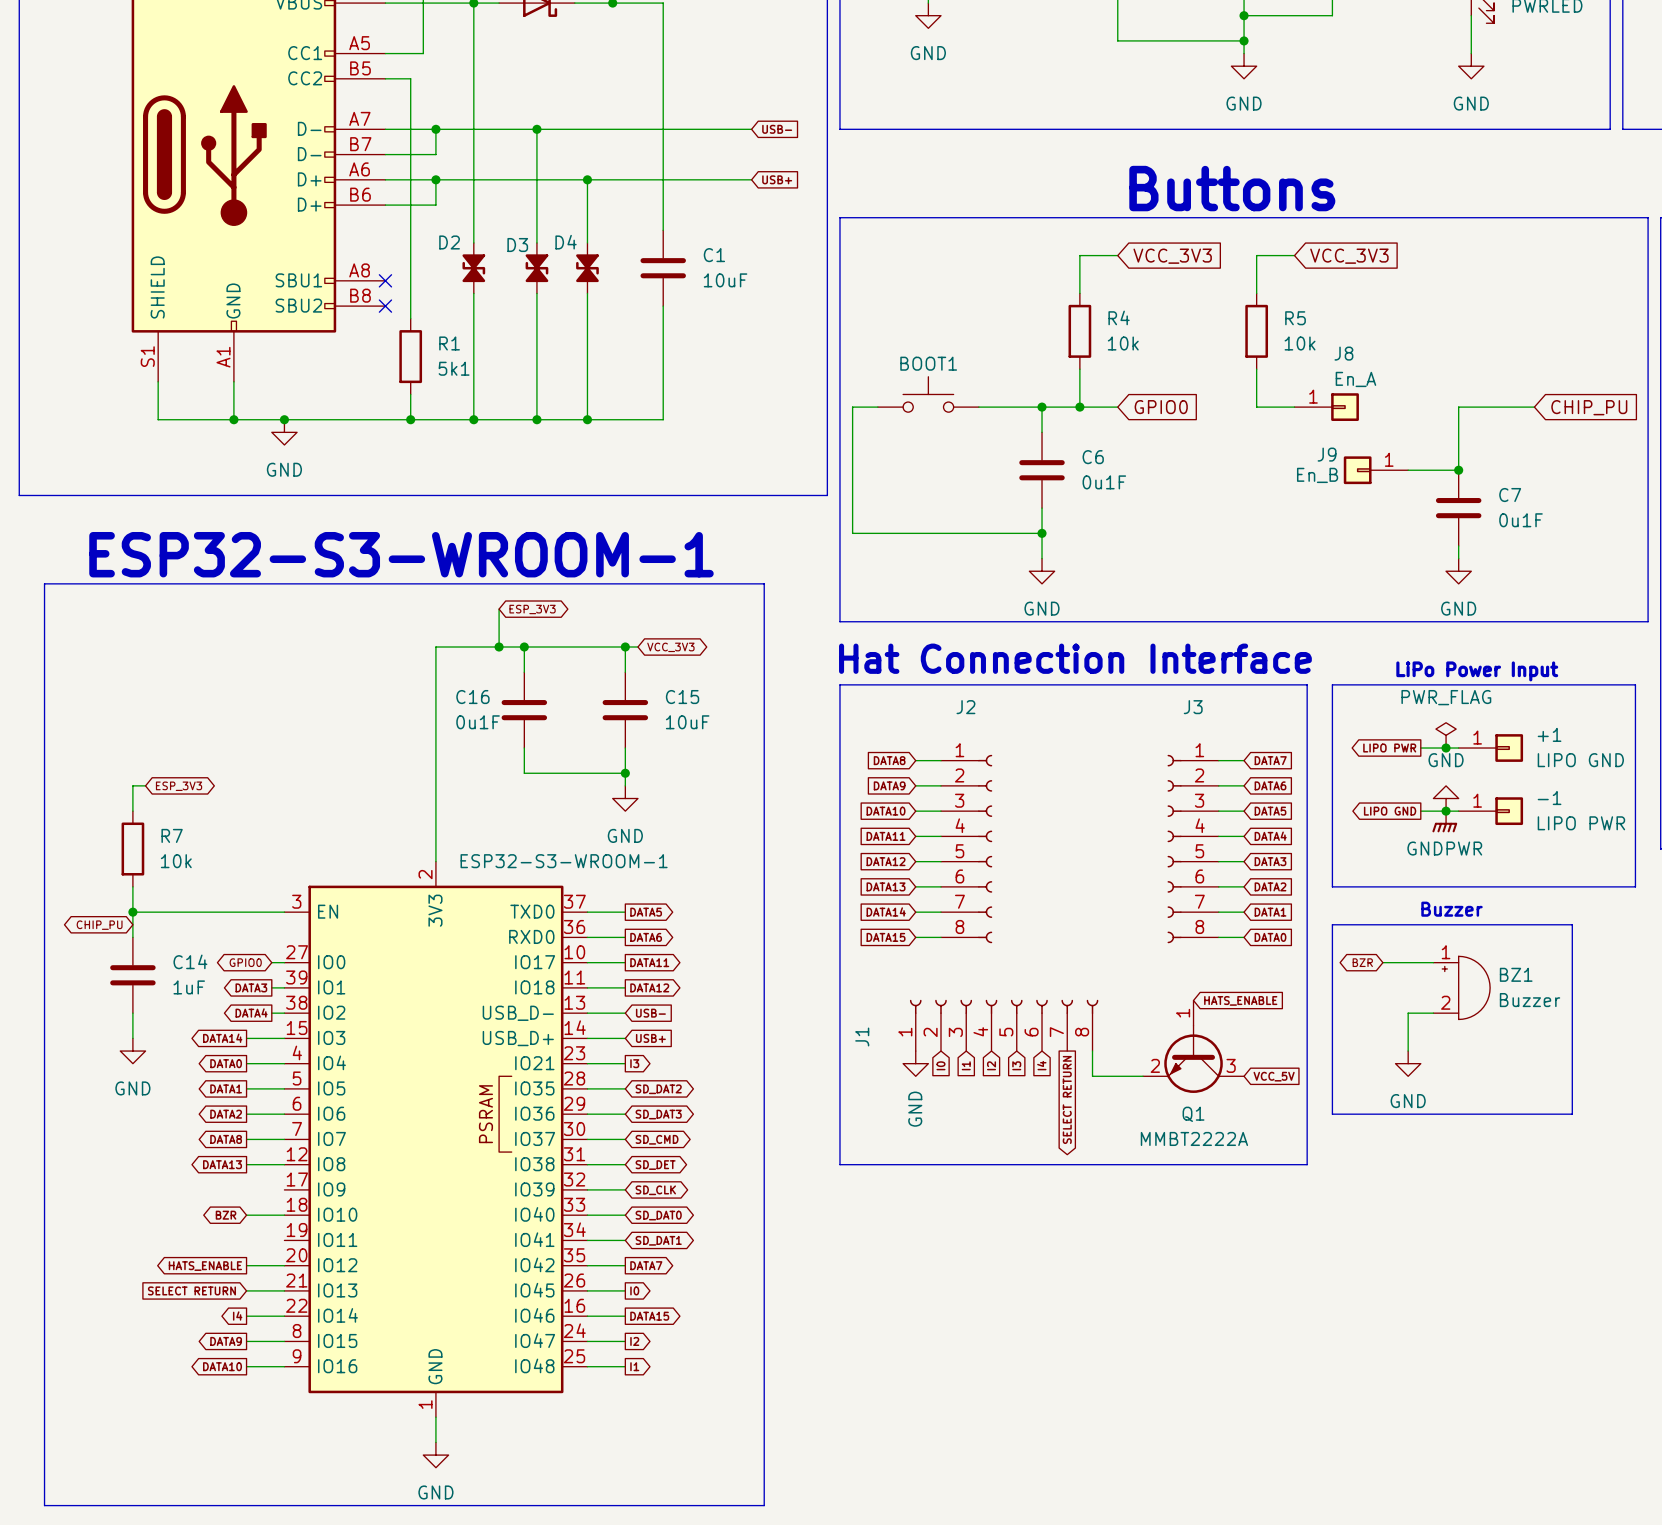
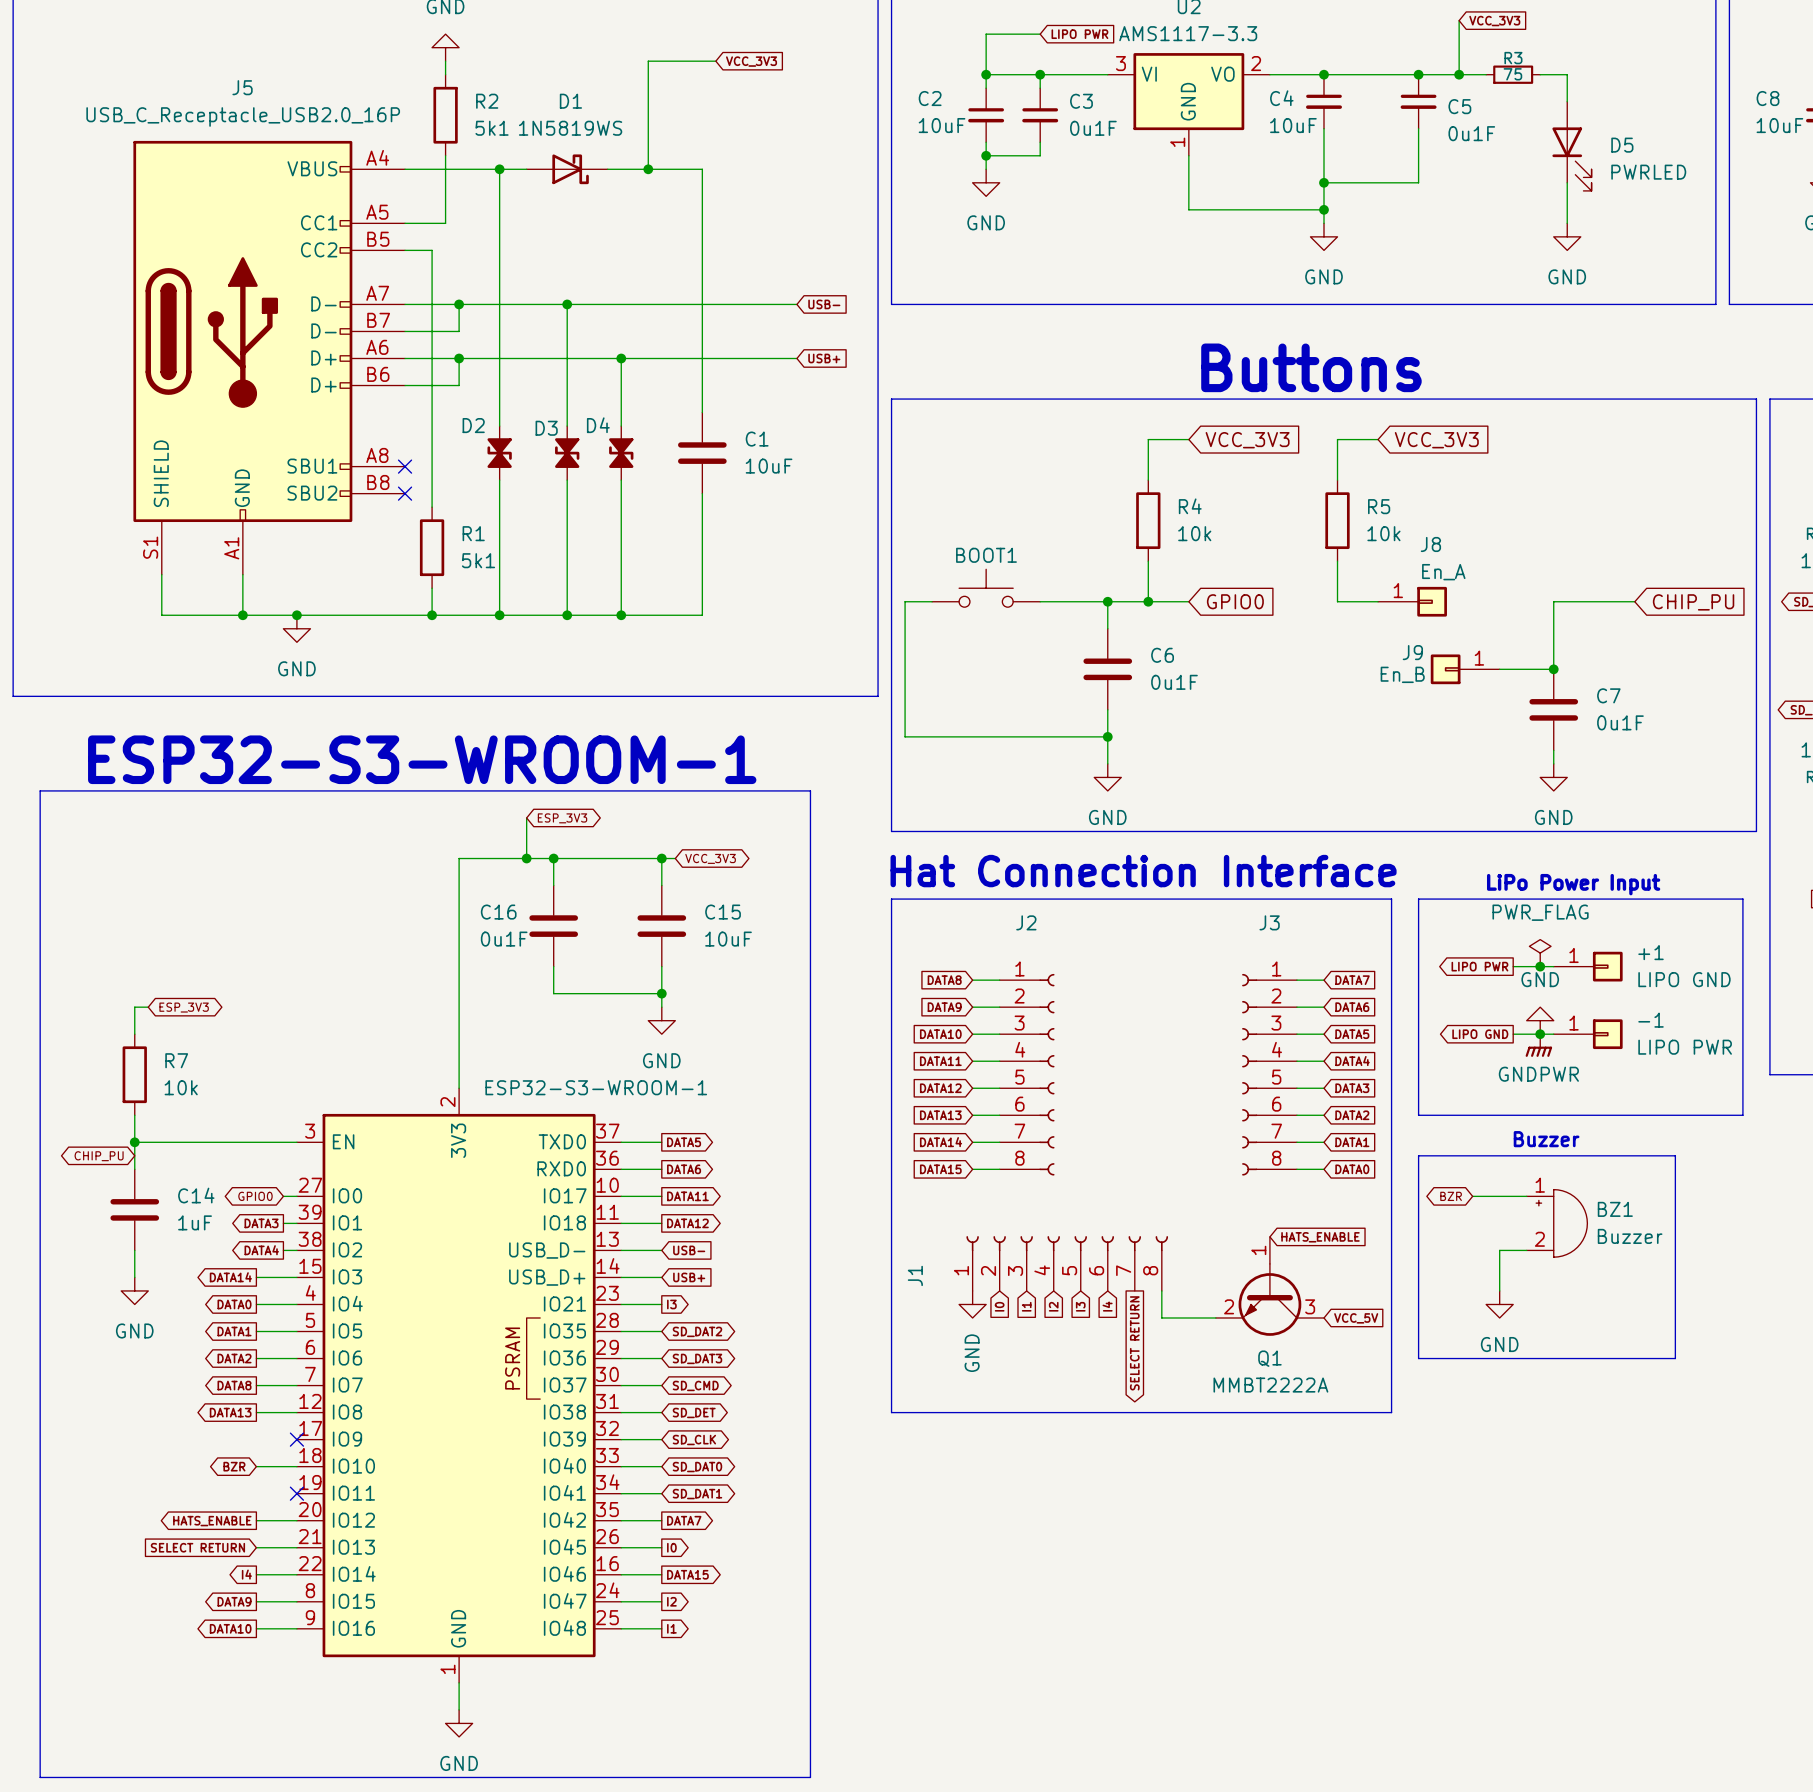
no-connect mark: none -> (296, 1439)
no-connect mark: none -> (296, 1493)

